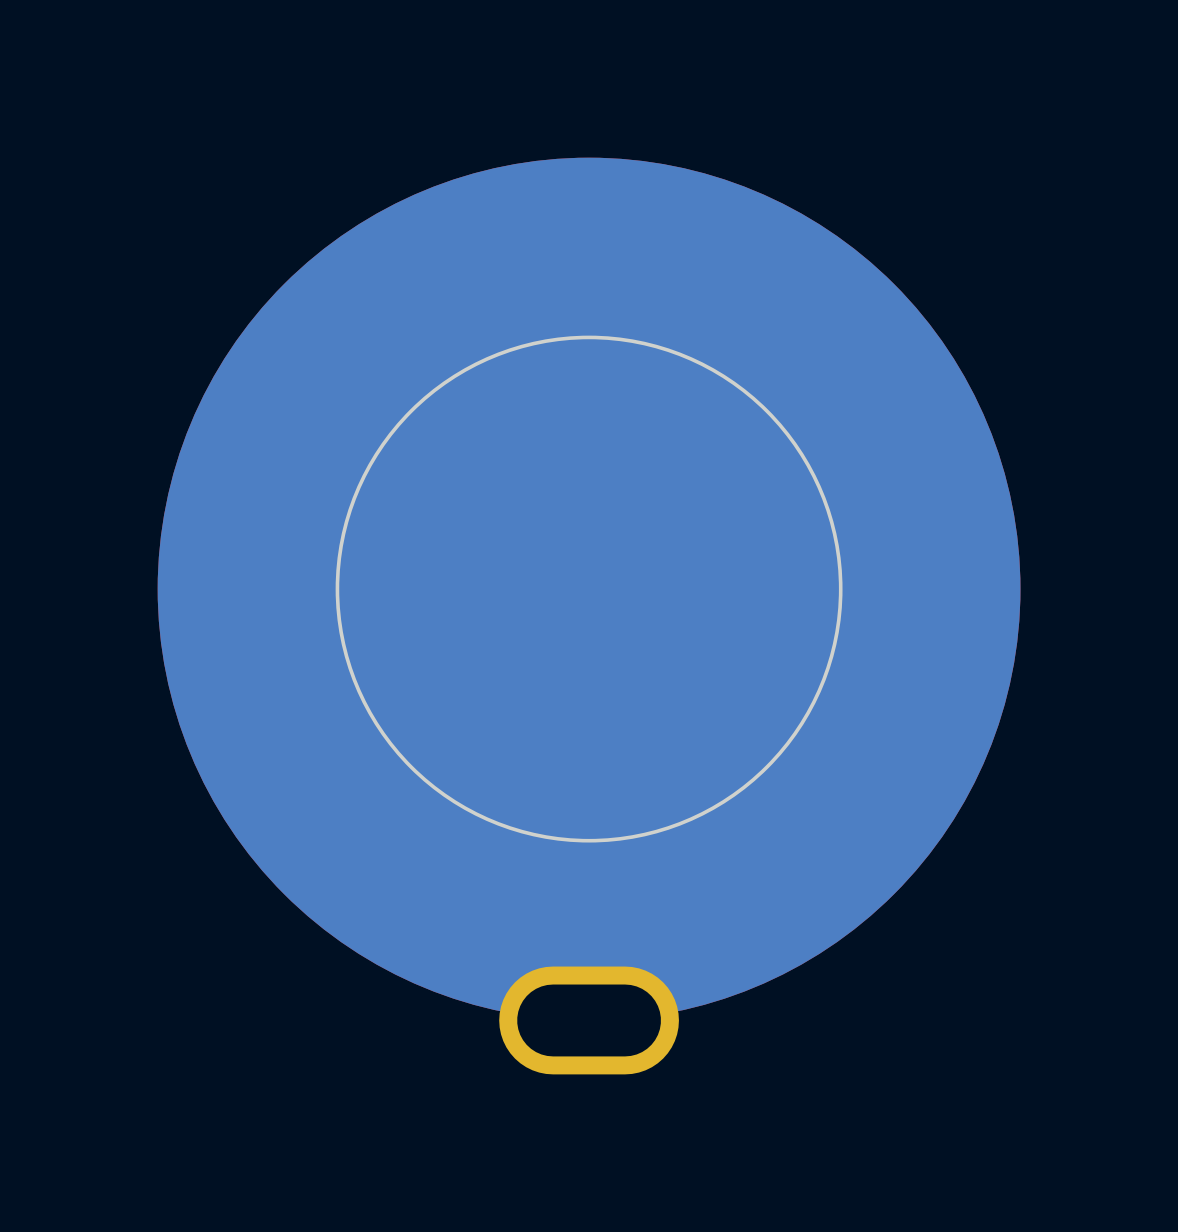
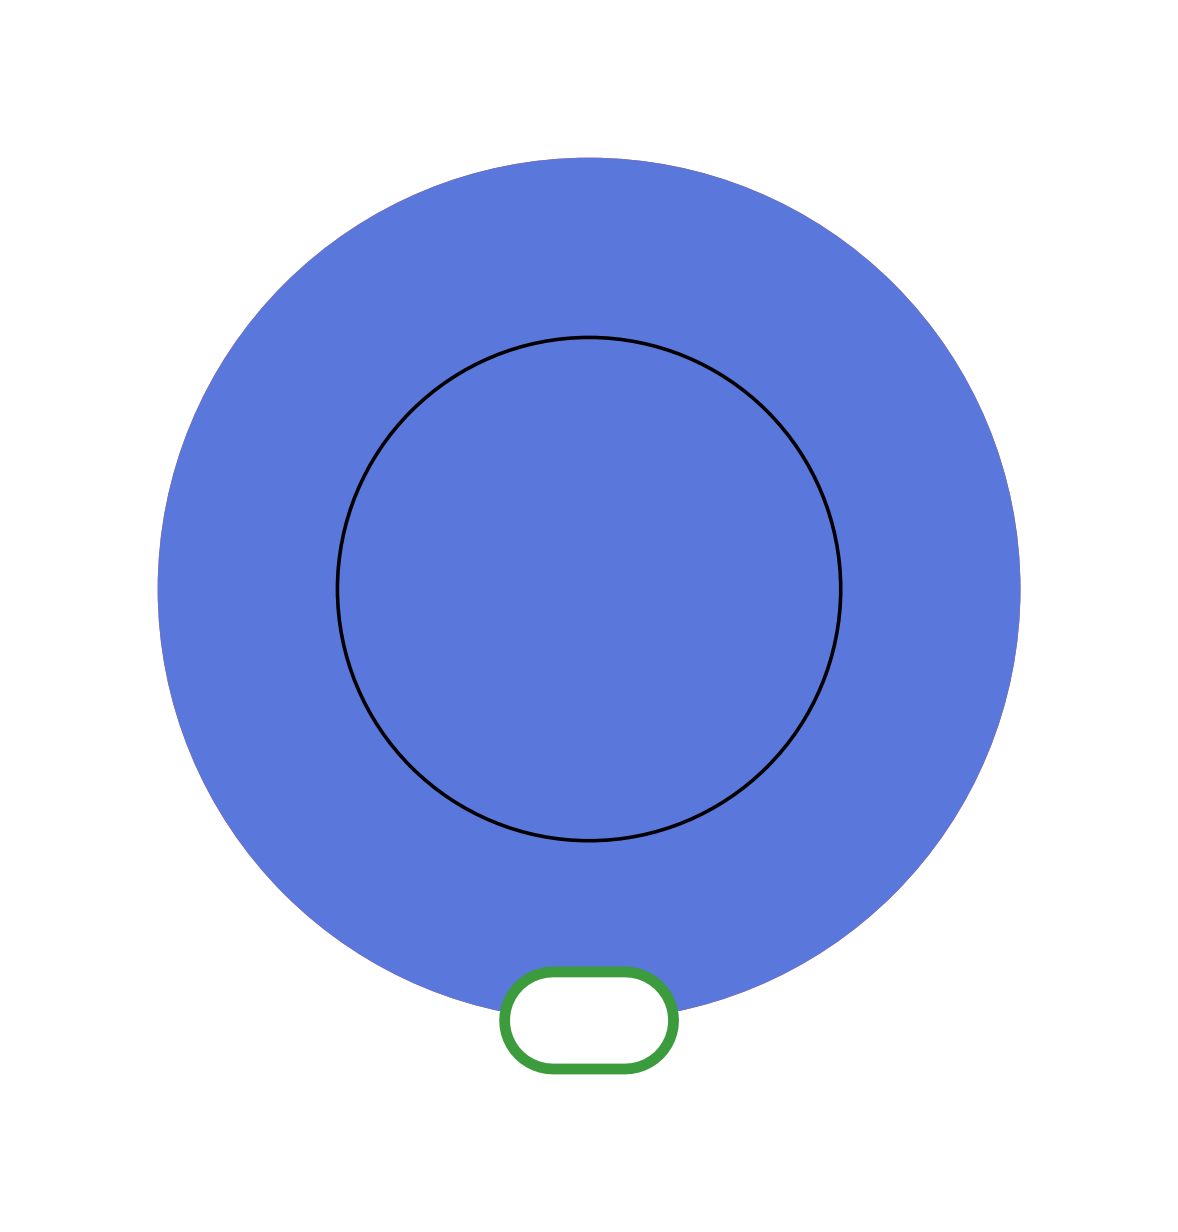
part footprint: [157, 157, 1021, 1075] -> [157, 157, 1021, 1075]

